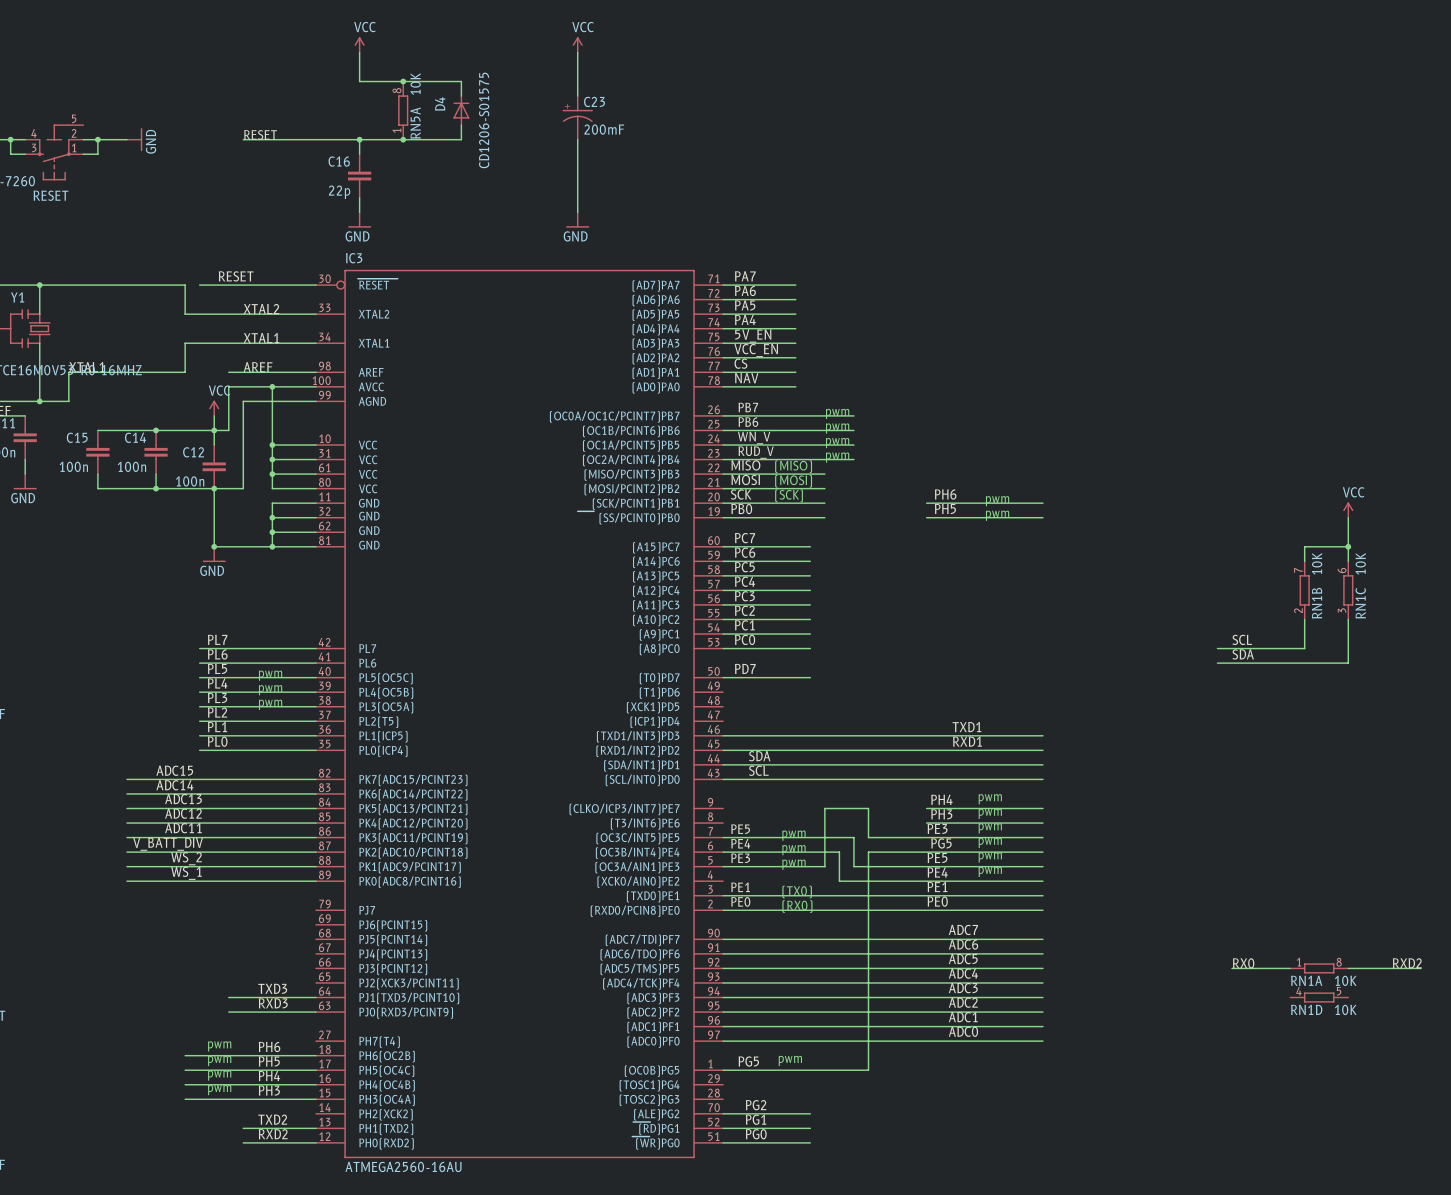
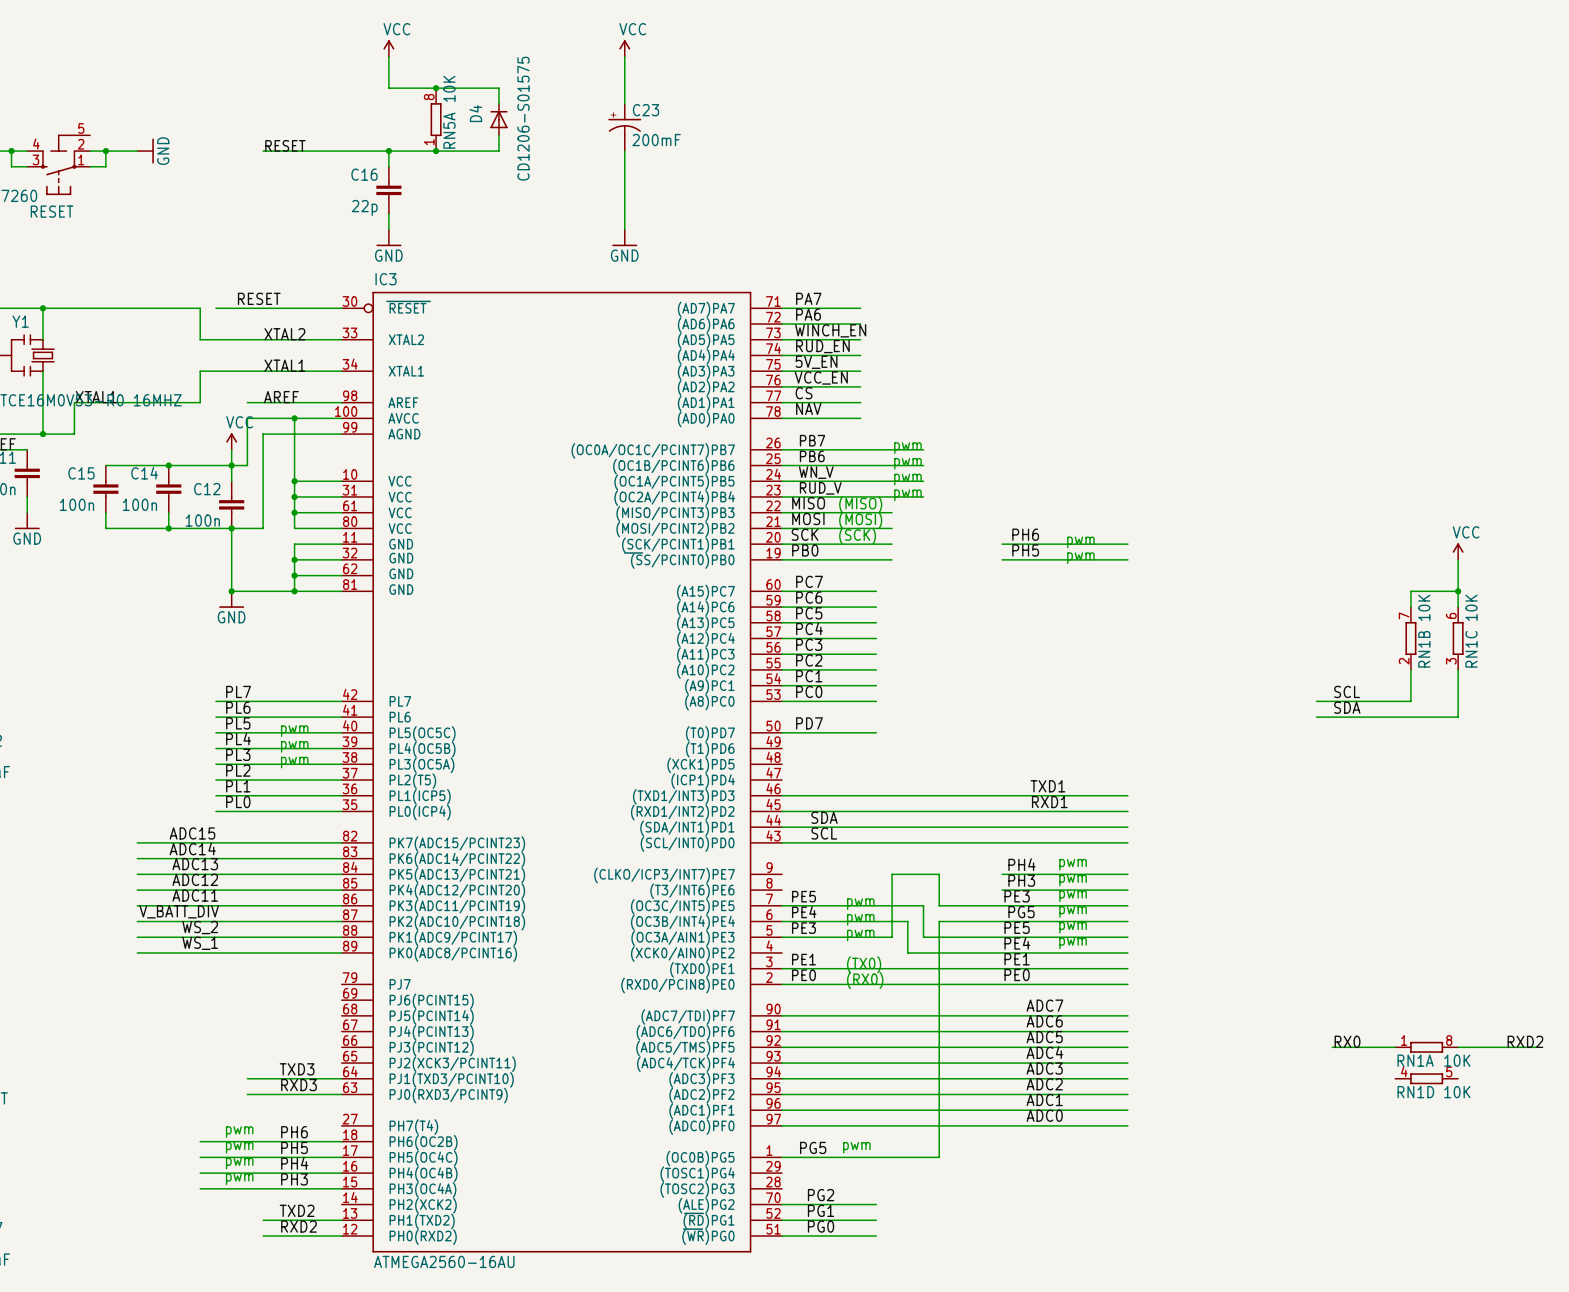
label: PA5 (745, 305) -> WINCH_EN (830, 330)
label: PA4 (745, 319) -> RUD_EN (822, 346)

